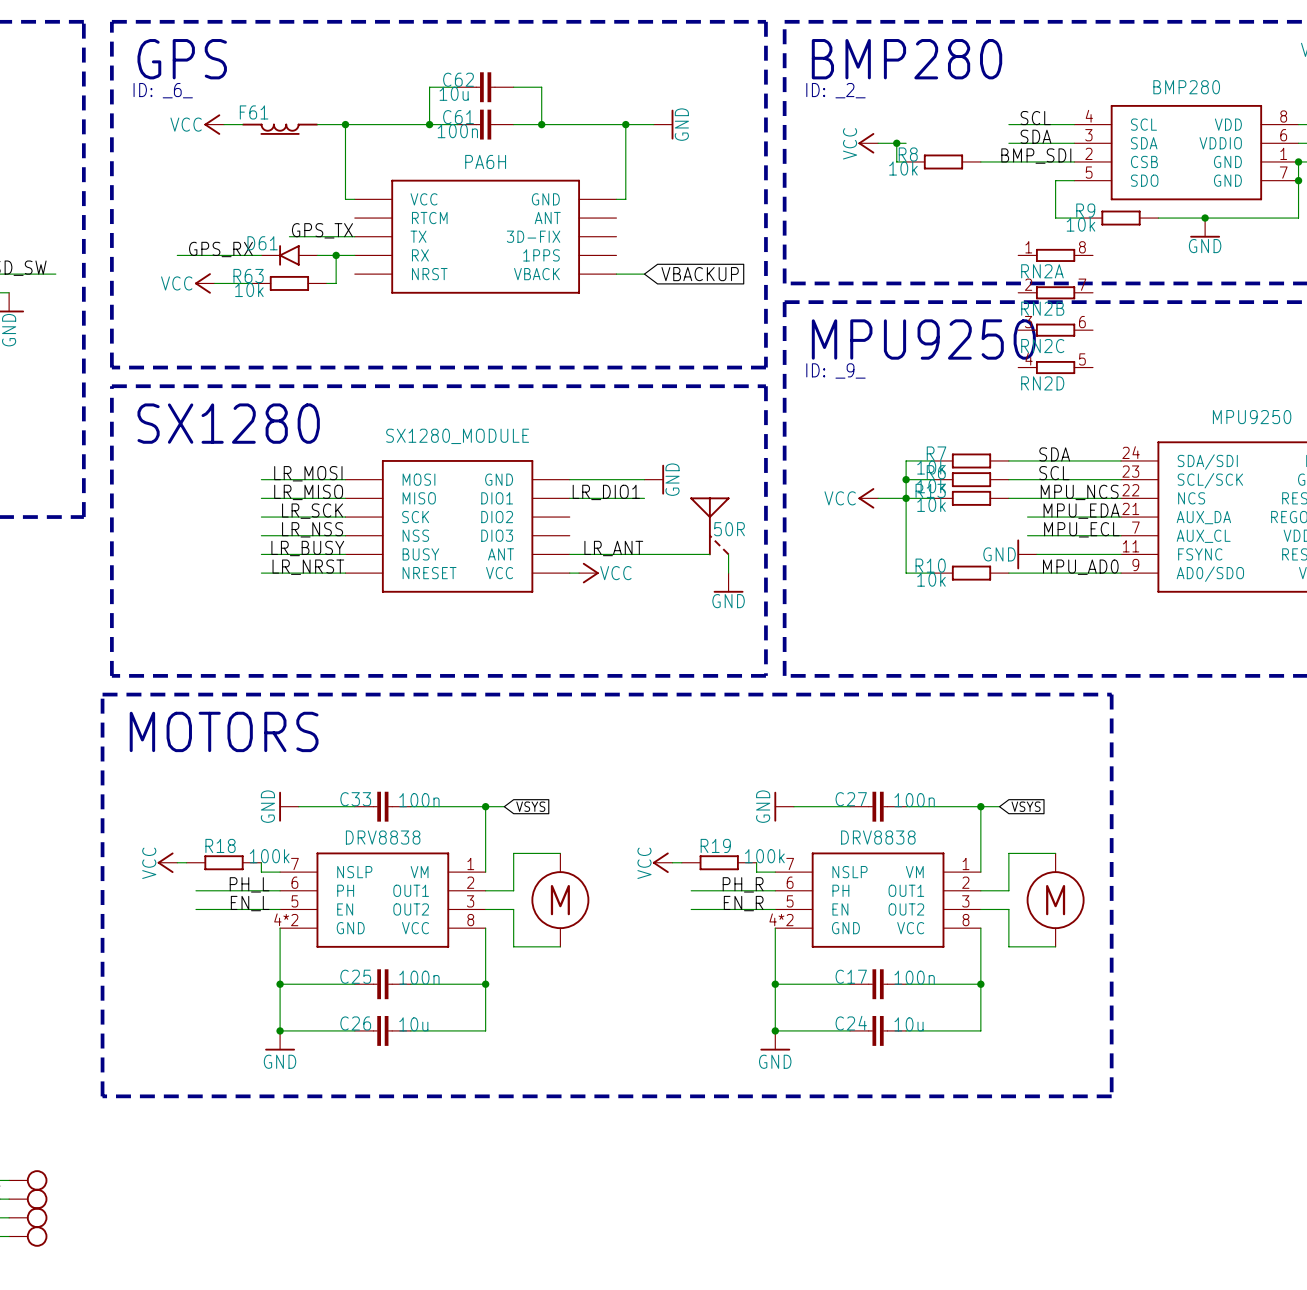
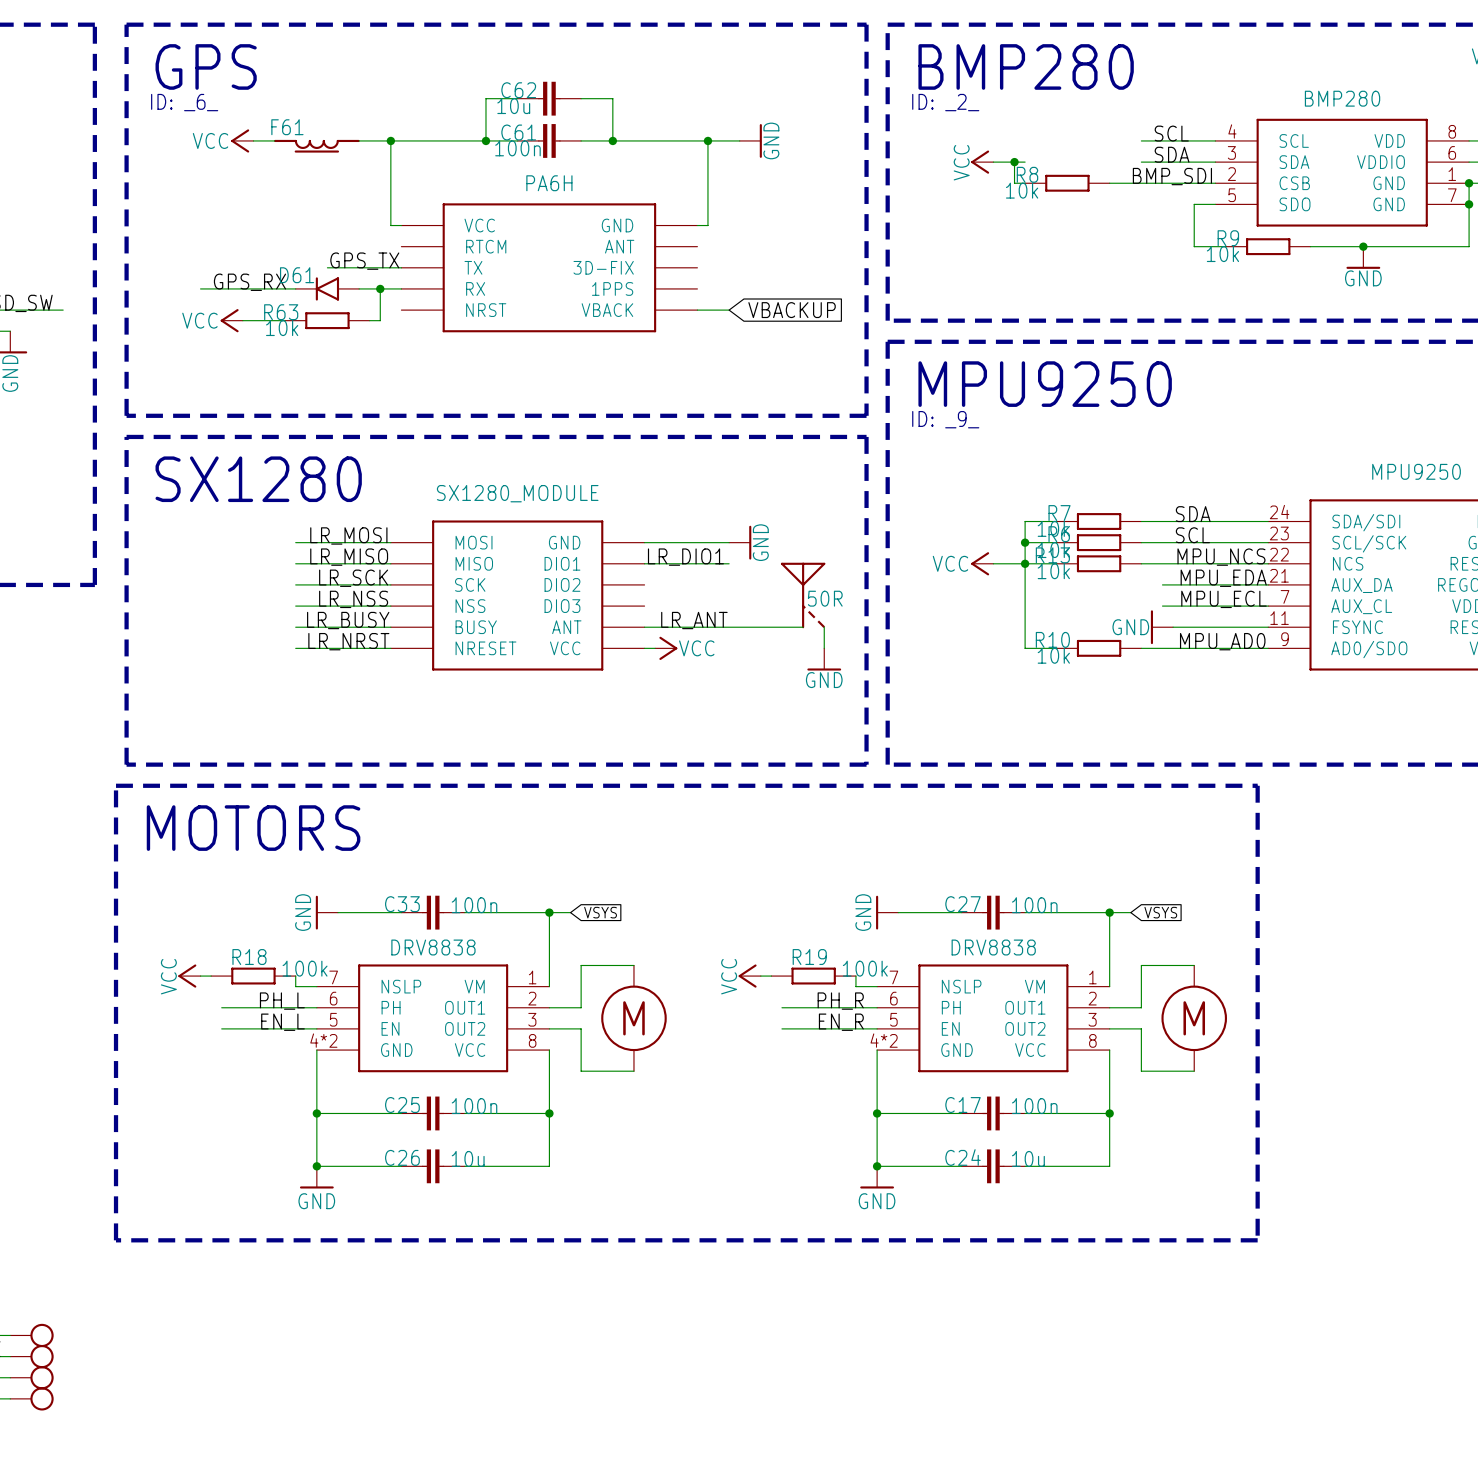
RN2A: (1055, 255) -> none
RN2B: (1055, 292) -> none
RN2C: (1055, 330) -> none
RN2D: (1055, 367) -> none

